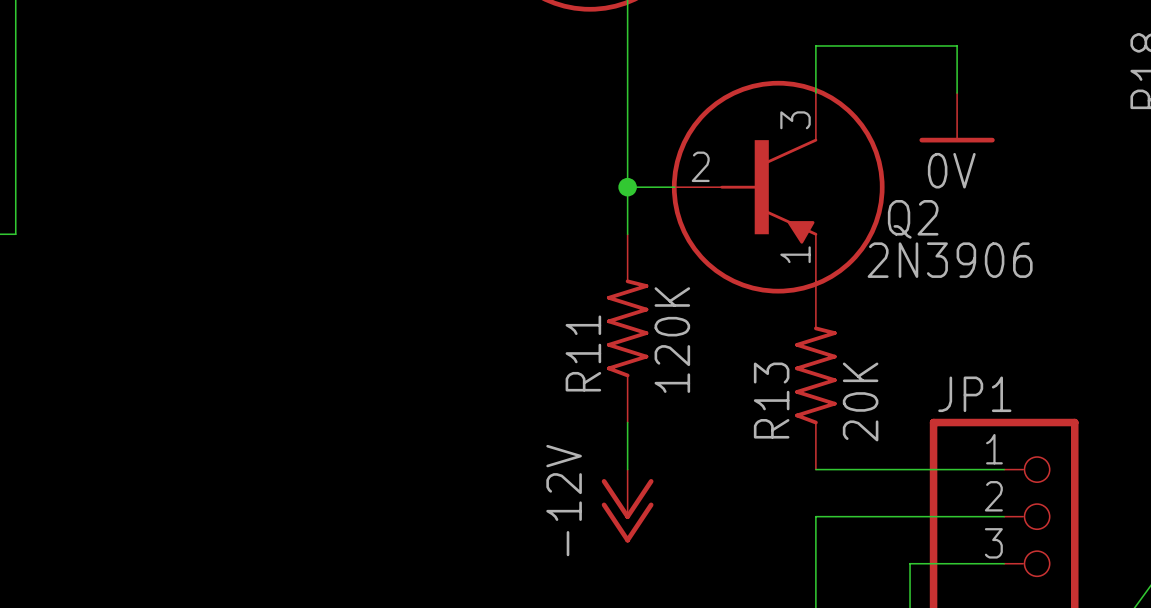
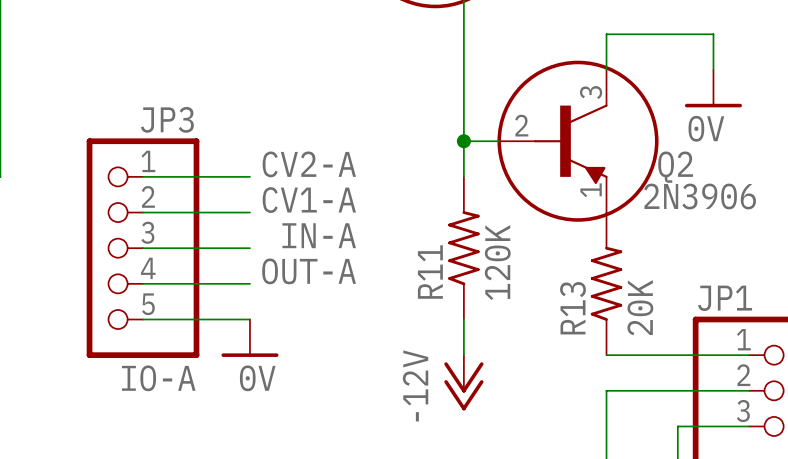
label: none -> CV2-A (309, 164)
wire: none -> (143, 176) (249, 176)
label: none -> CV1-A (309, 200)
wire: none -> (143, 212) (249, 212)
label: none -> IN-A (319, 235)
wire: none -> (143, 248) (249, 248)
JP3: none -> IO-A (143, 248)
label: none -> OUT-A (309, 271)
wire: none -> (143, 283) (249, 283)
wire: none -> (143, 319) (249, 319)
power symbol: none -> 0V (249, 338)

